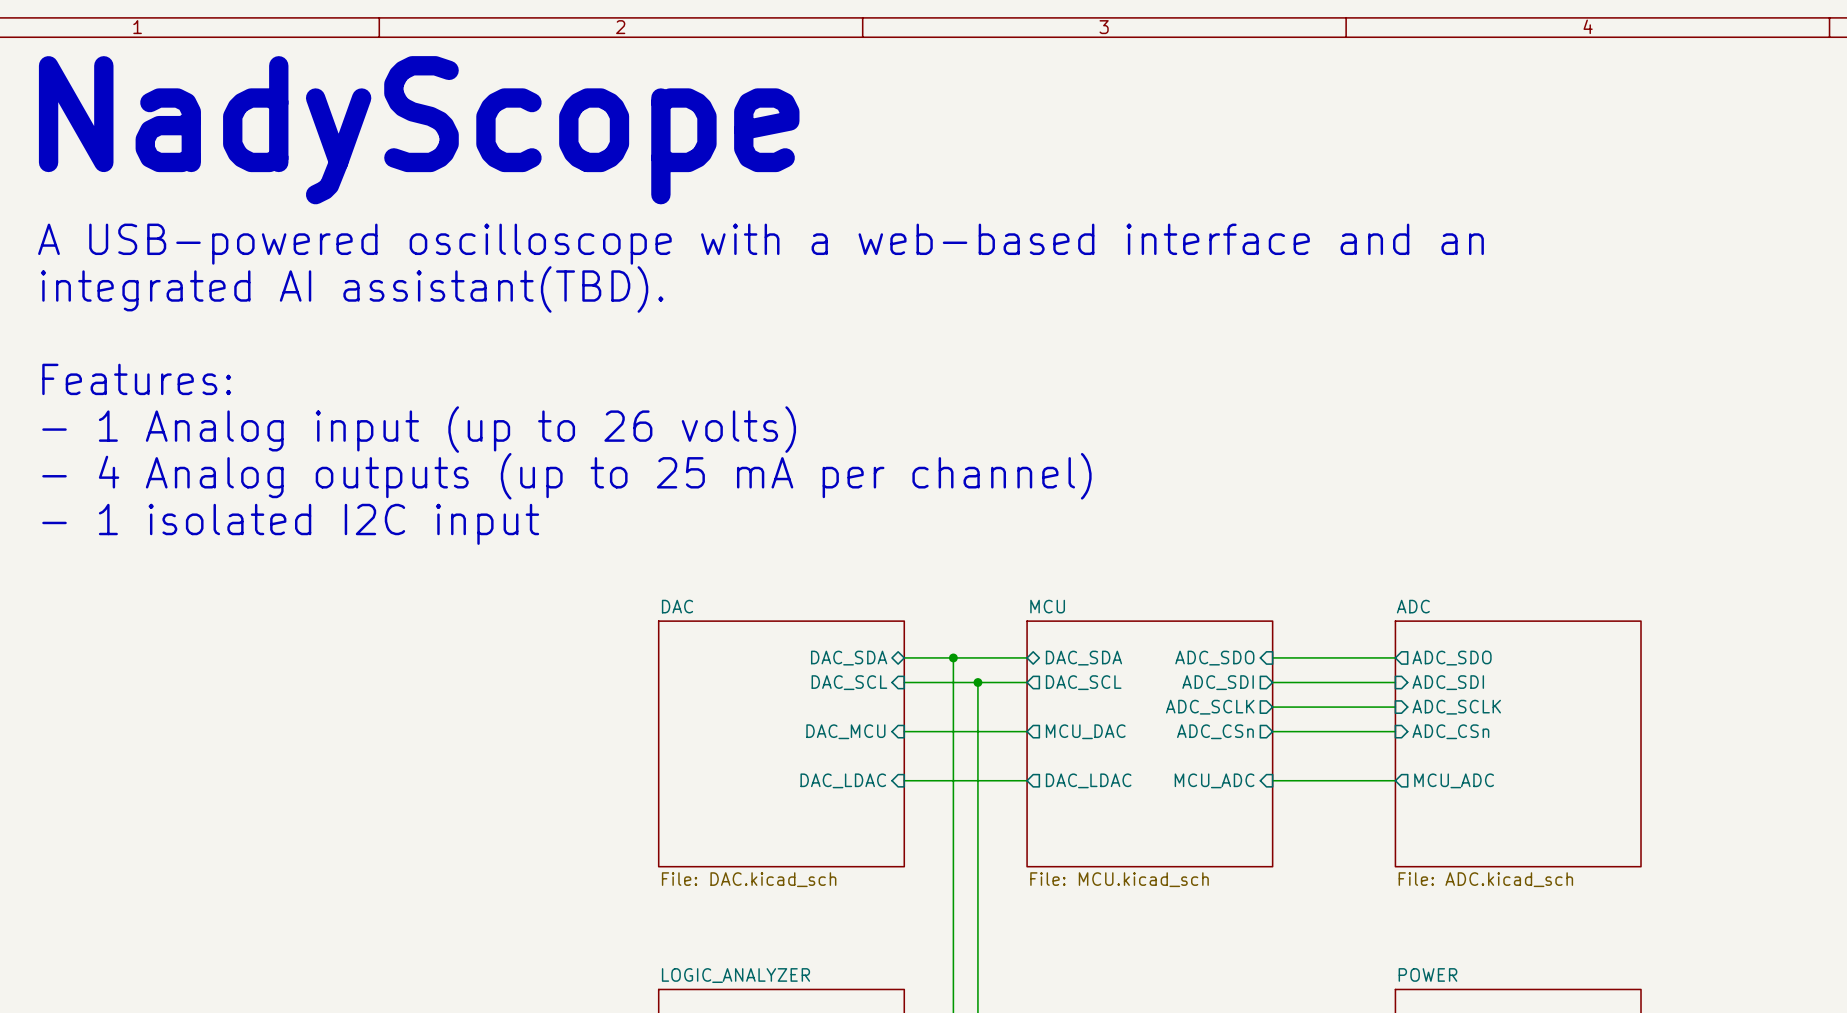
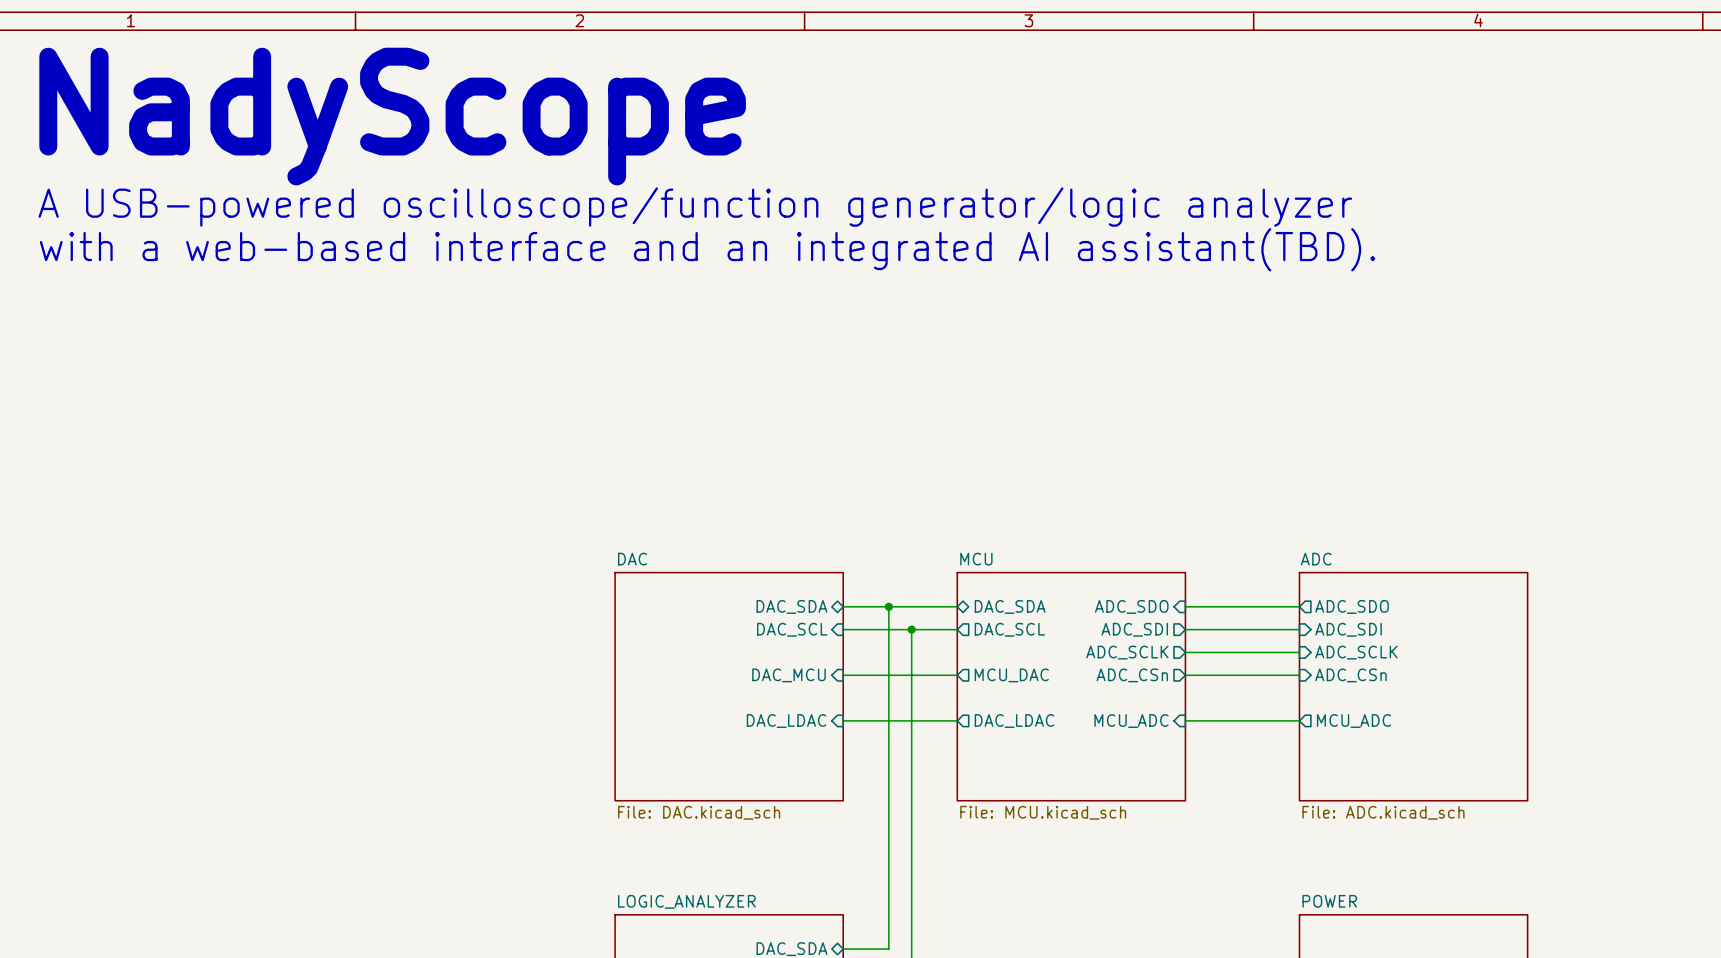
text: A USB-powered oscilloscope with a web-based interface and an (760, 244) -> A USB-powered oscilloscope/function generator/logic analyzer (695, 207)
text: integrated AI assistant(TBD). (352, 289) -> with a web-based interface and an integrated AI assistant(TBD). (707, 249)
text: Features: (136, 379) -> none
text: - 1 Analog input (up to 26 volts) (419, 429) -> none
text: - 4 Analog outputs (up to 25 mA per channel) (566, 476) -> none
text: - 1 isolated I2C input (290, 524) -> none

